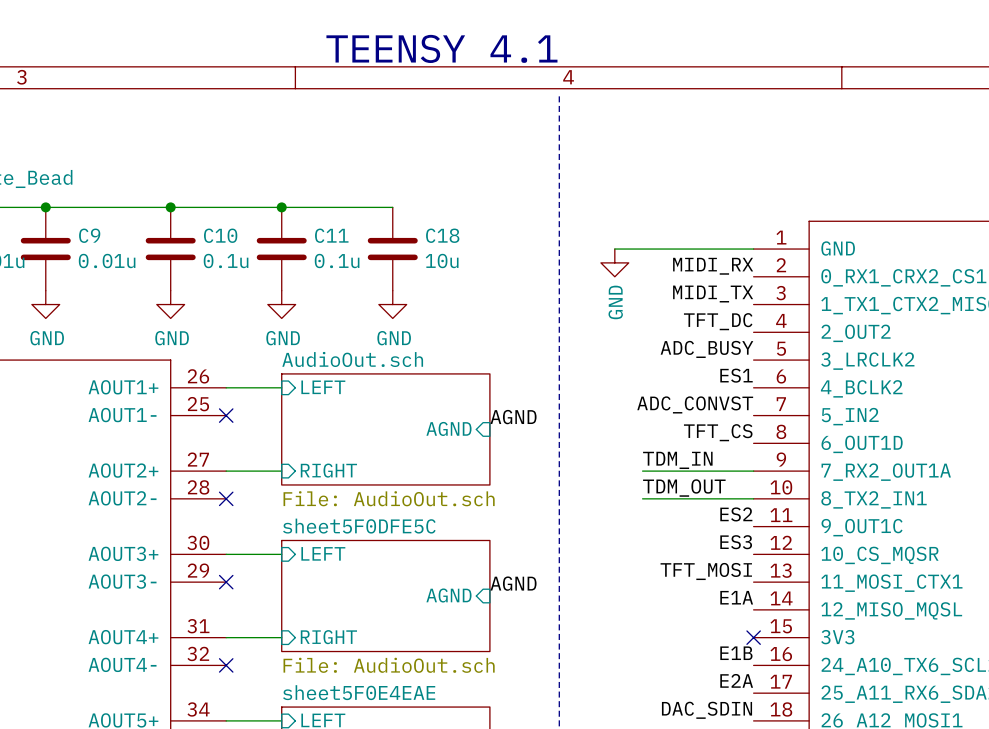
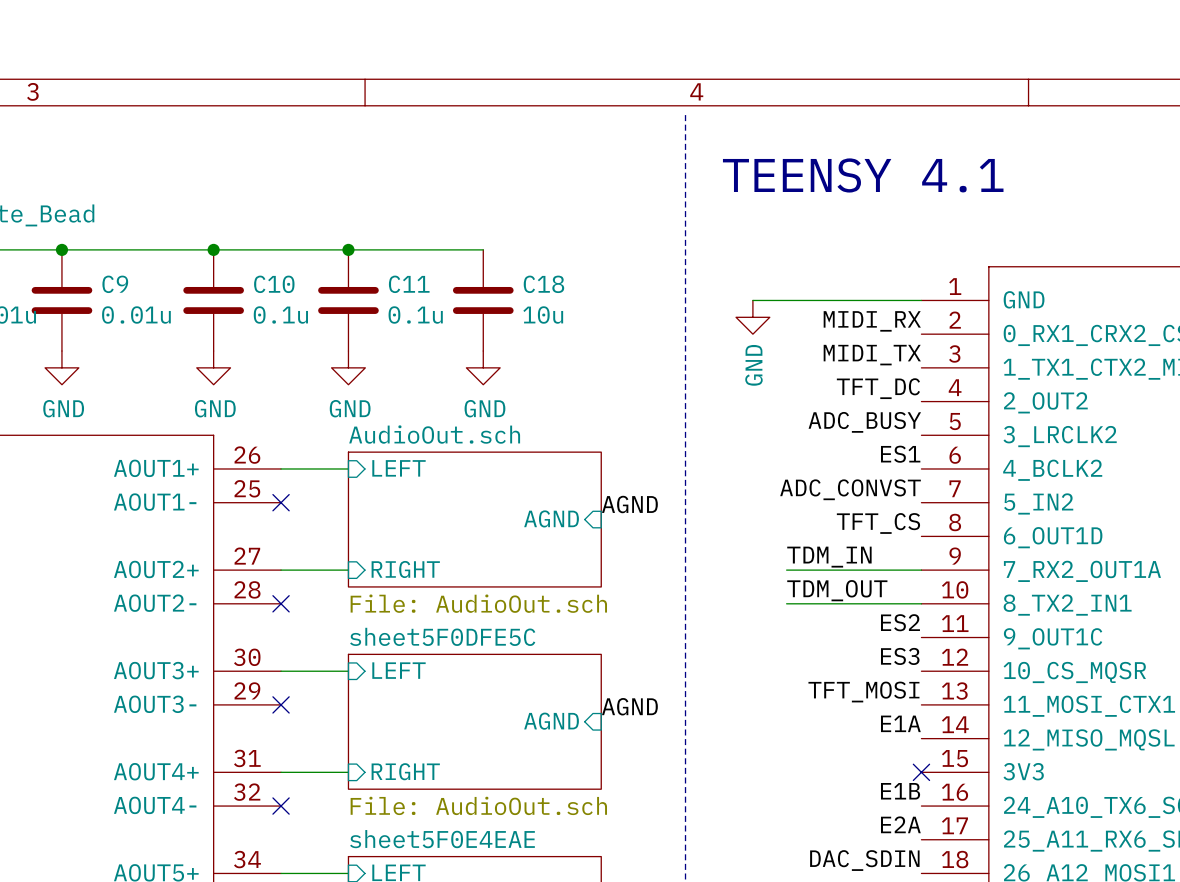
text: TEENSY 4.1 (441, 48) -> none
text: none -> TEENSY 4.1 (863, 175)

